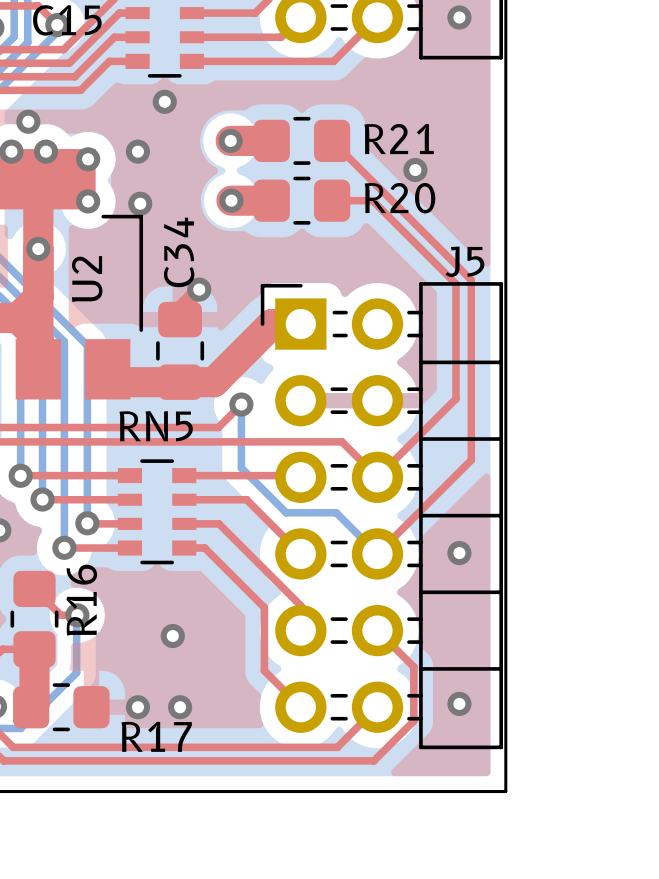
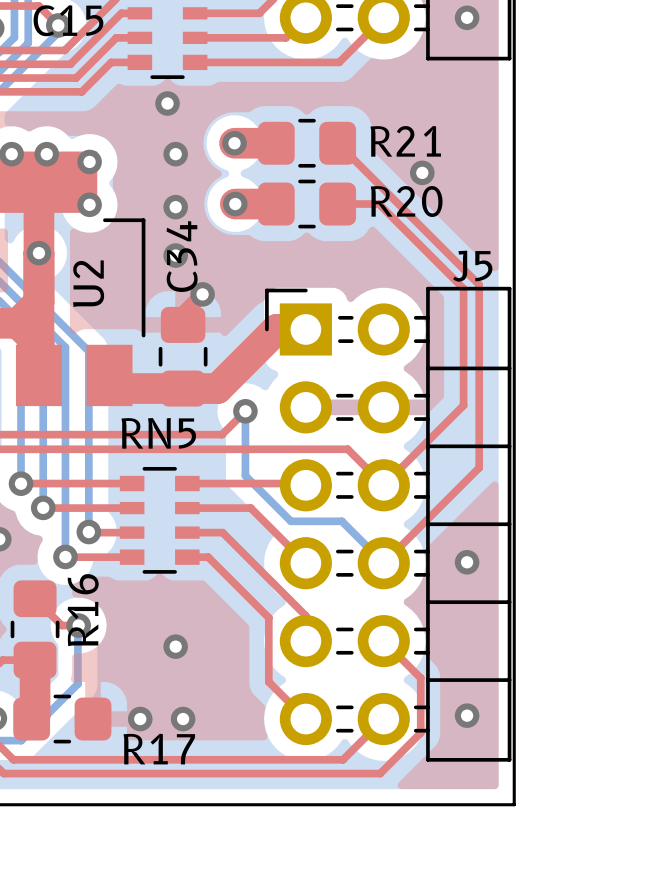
via: (28, 121) -> none
via: (137, 151) -> none
via: none -> (175, 154)
via: (140, 203) -> none
via: none -> (175, 207)
via: none -> (175, 255)

